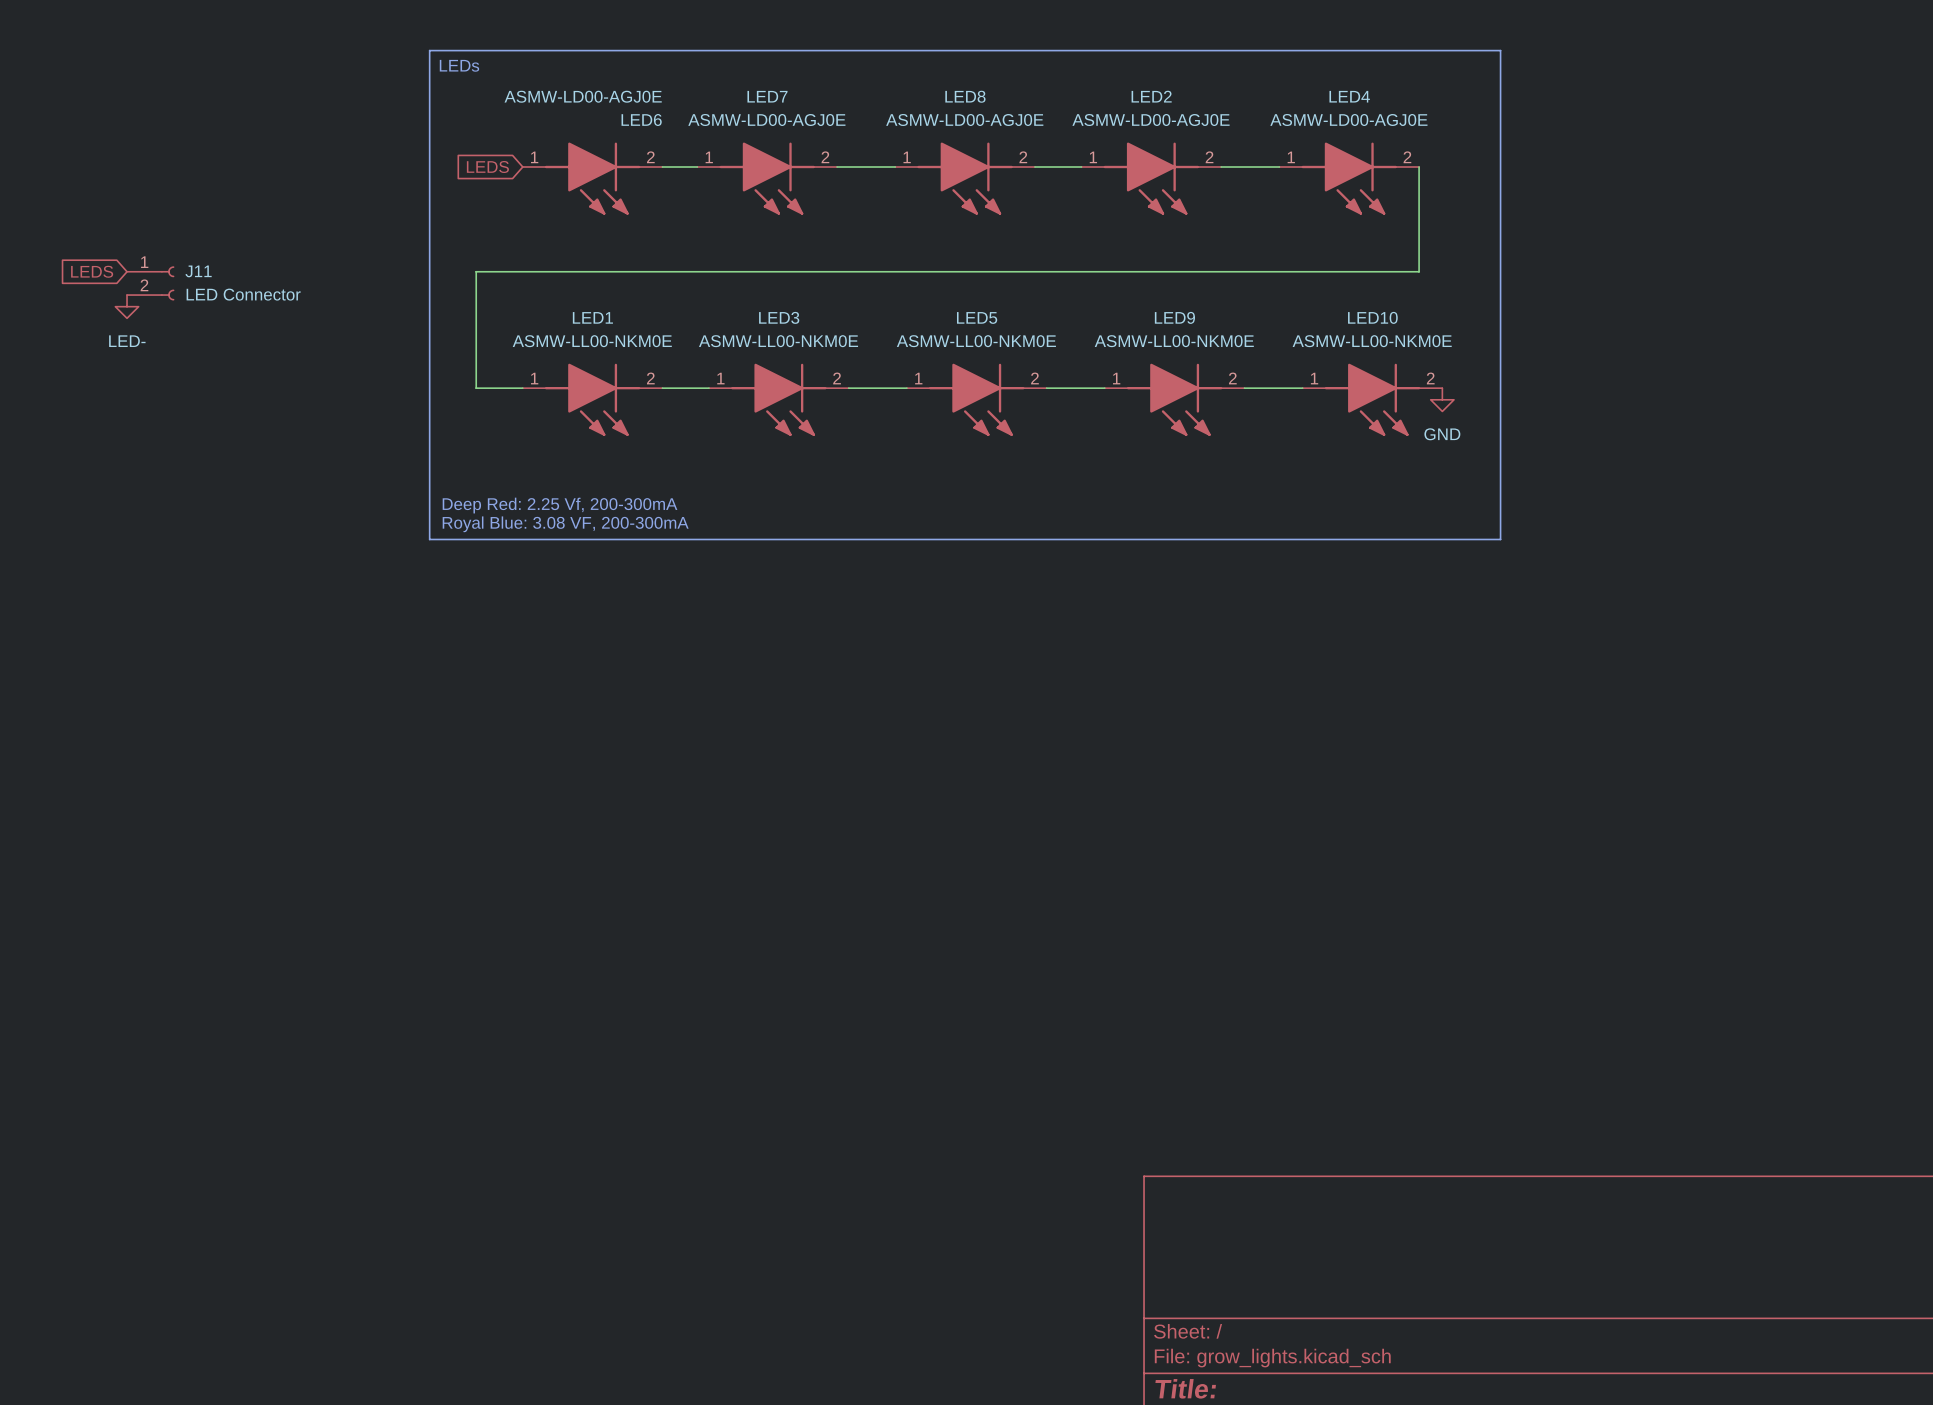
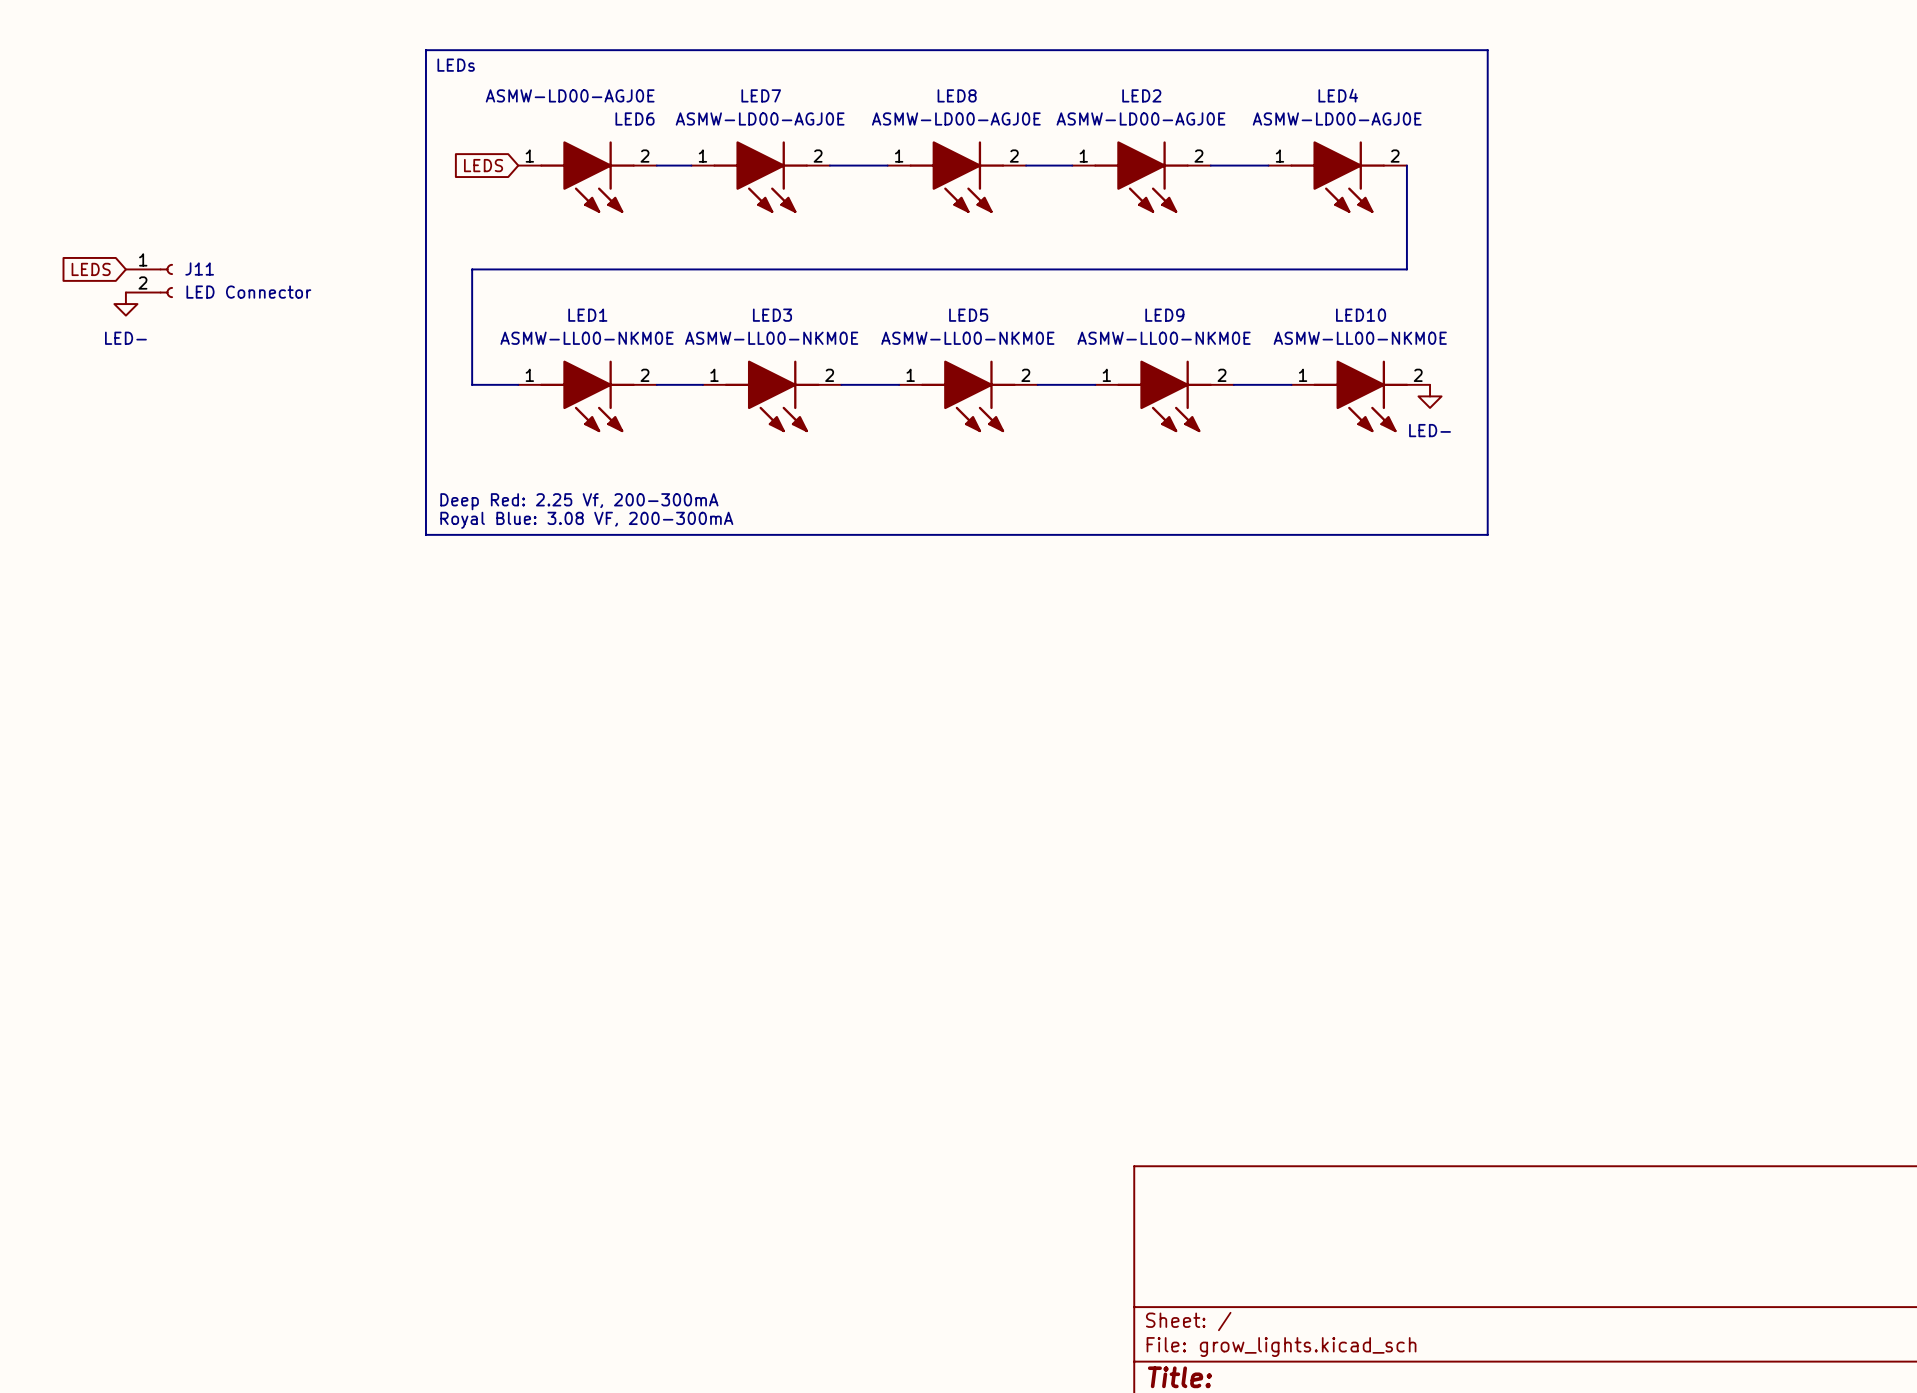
power symbol: GND (1442, 399) -> LED- (1430, 396)

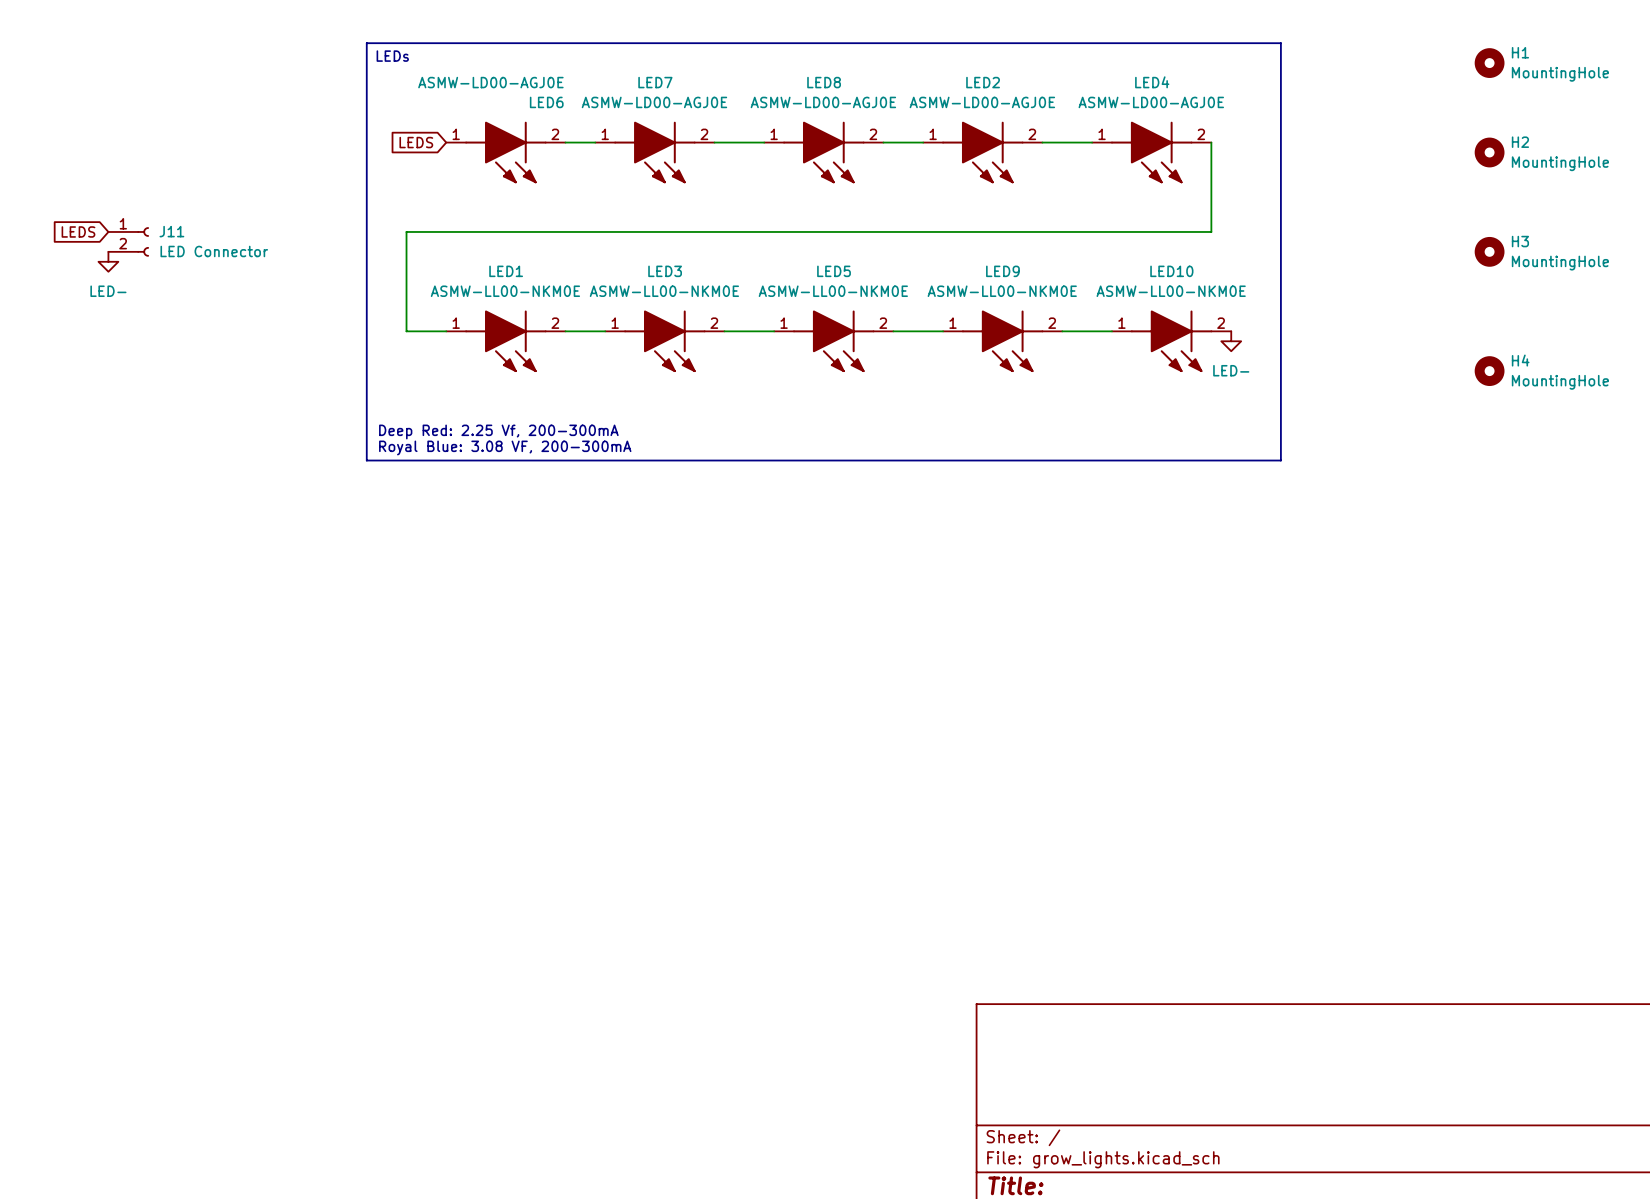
H1: none -> MountingHole (1489, 63)
H2: none -> MountingHole (1489, 152)
H3: none -> MountingHole (1489, 251)
H4: none -> MountingHole (1489, 371)

